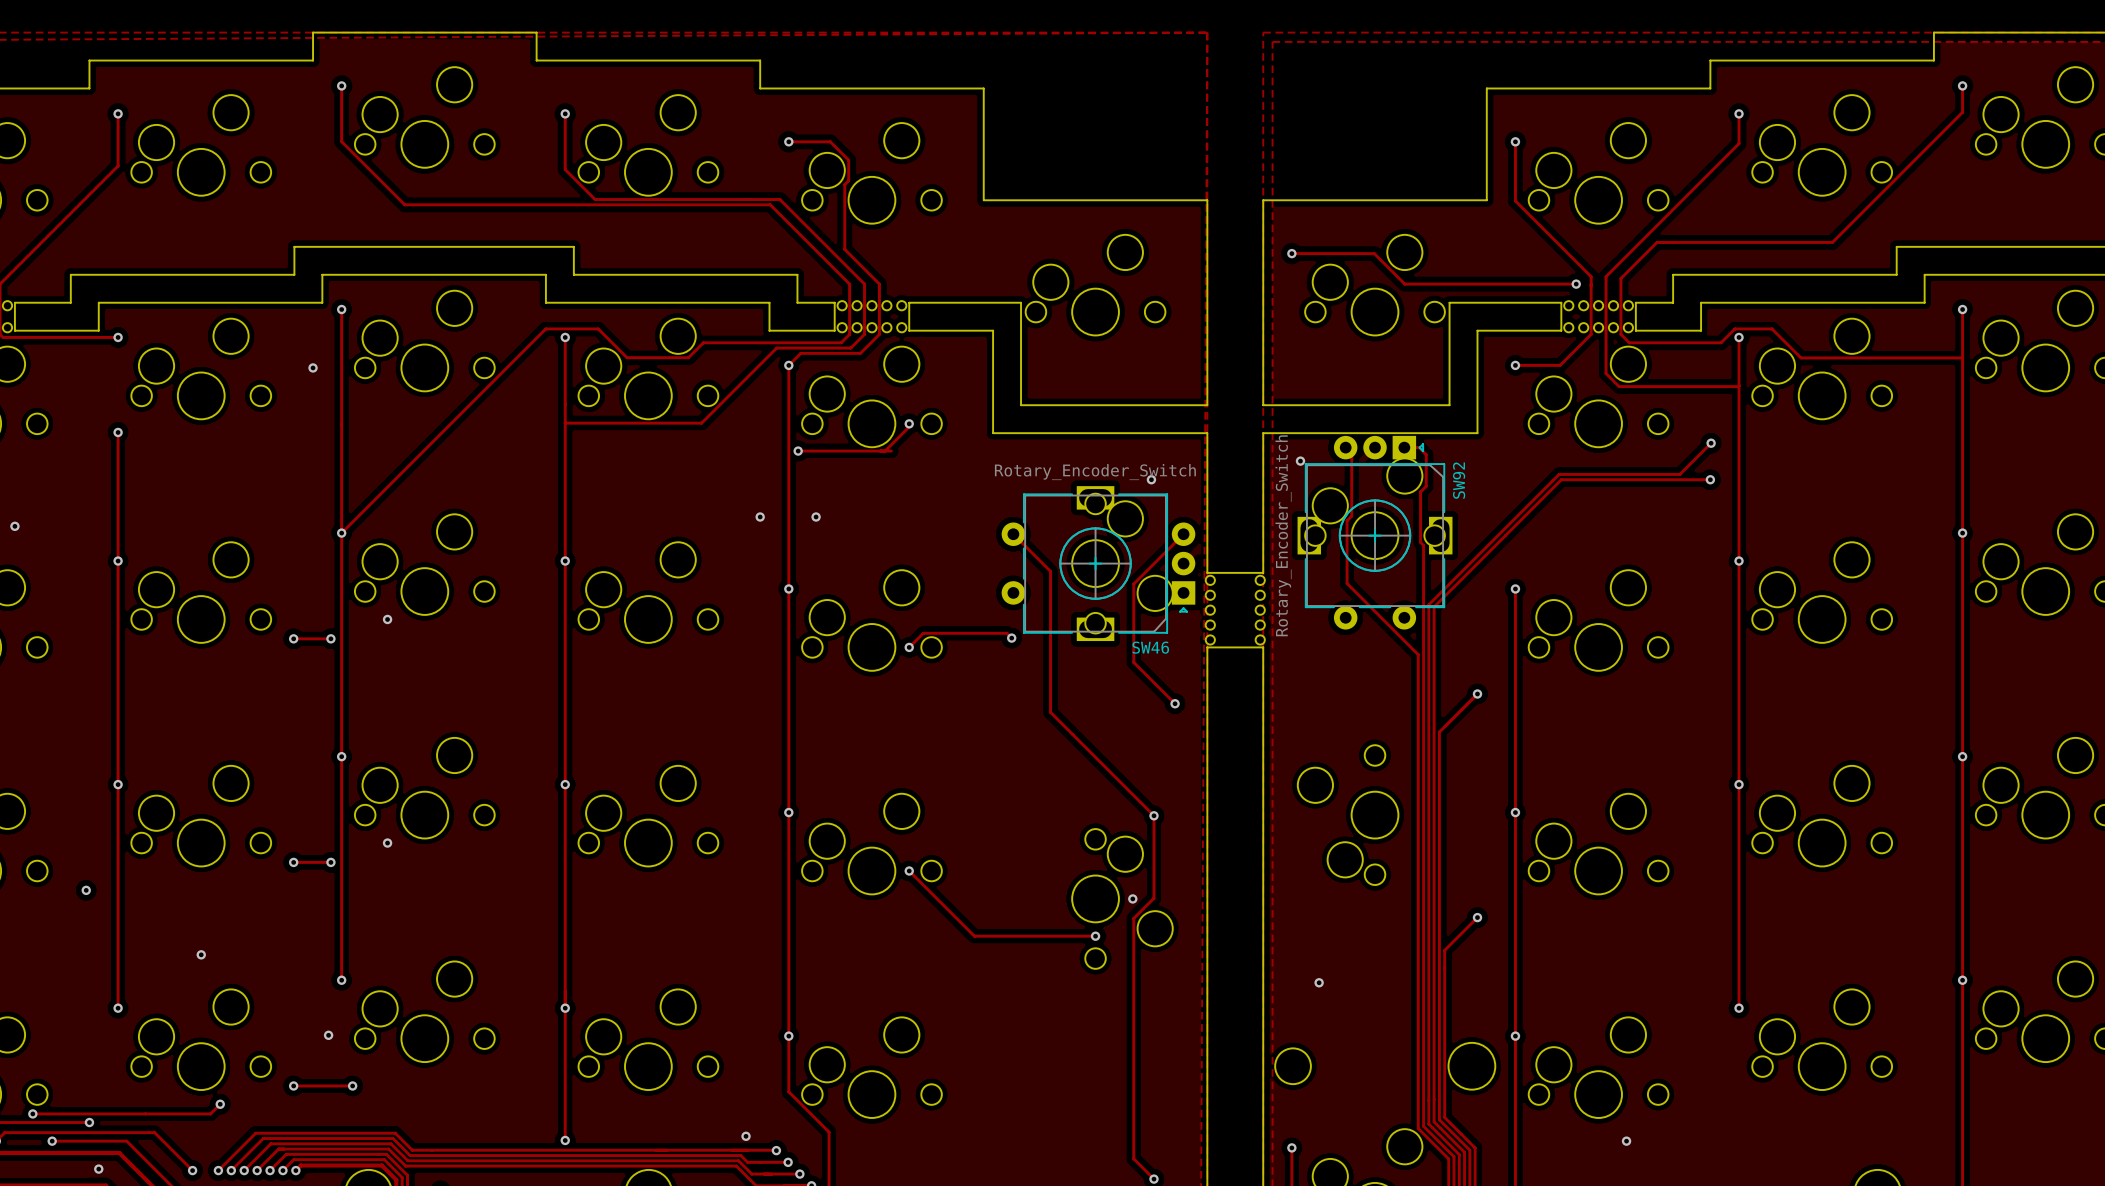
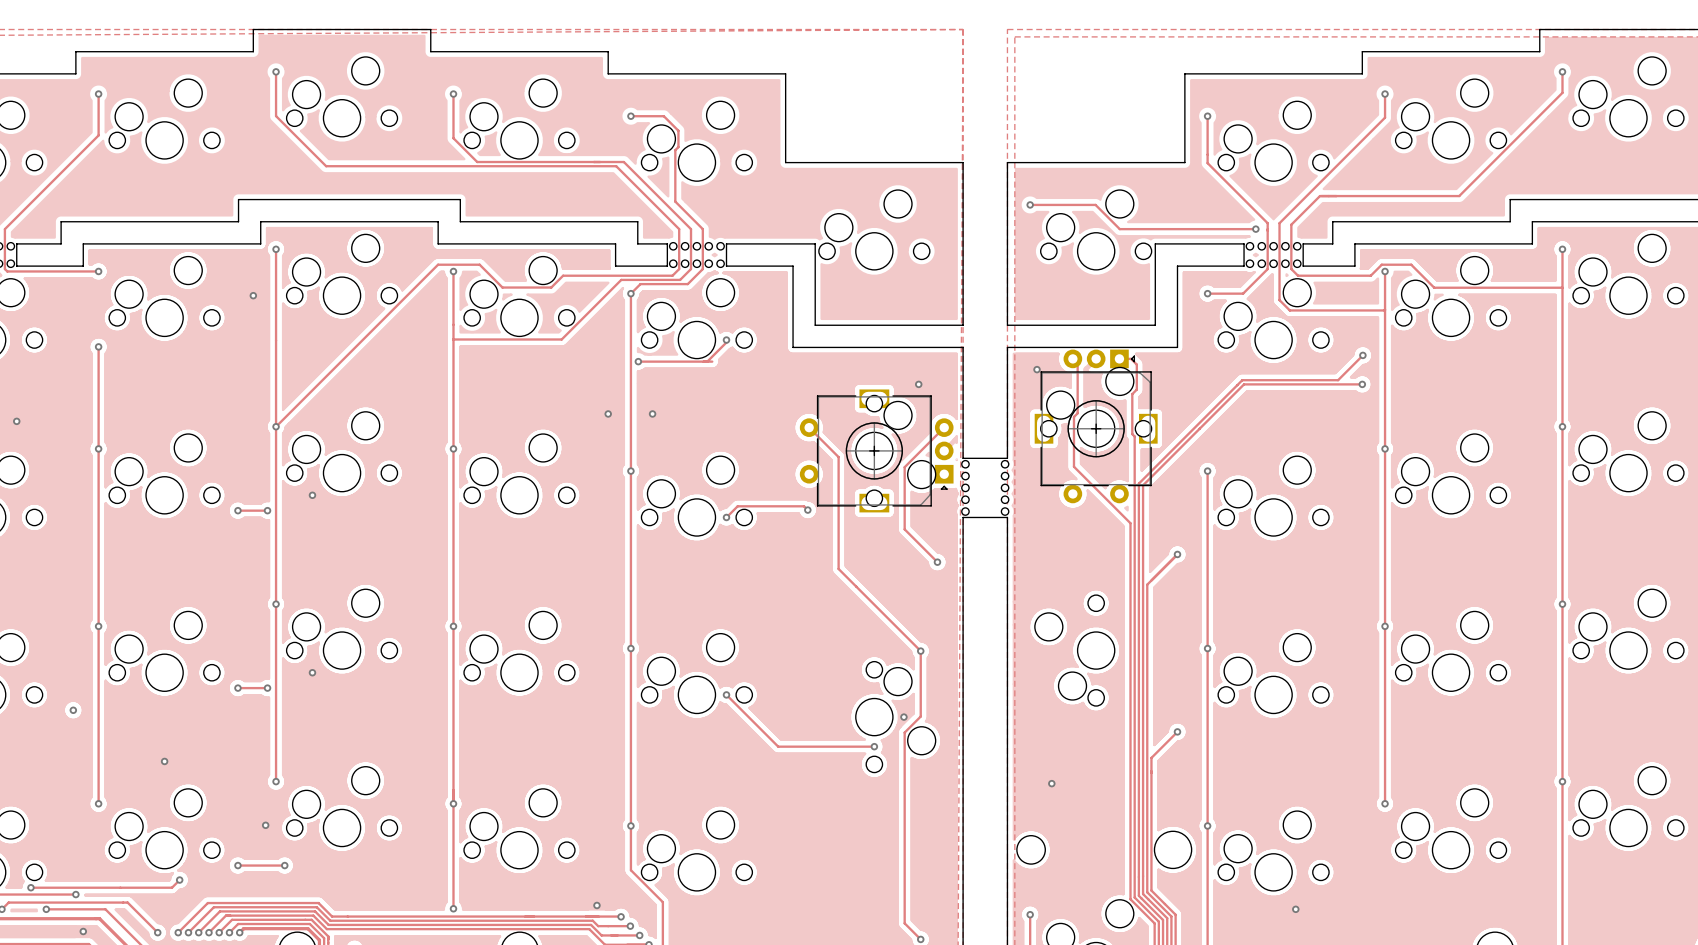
SW46 value: Rotary_Encoder_Switch (1095, 472) -> none
SW92 name: SW92 (1459, 480) -> none
SW92 value: Rotary_Encoder_Switch (1283, 535) -> none
SW46 name: SW46 (1150, 647) -> none

